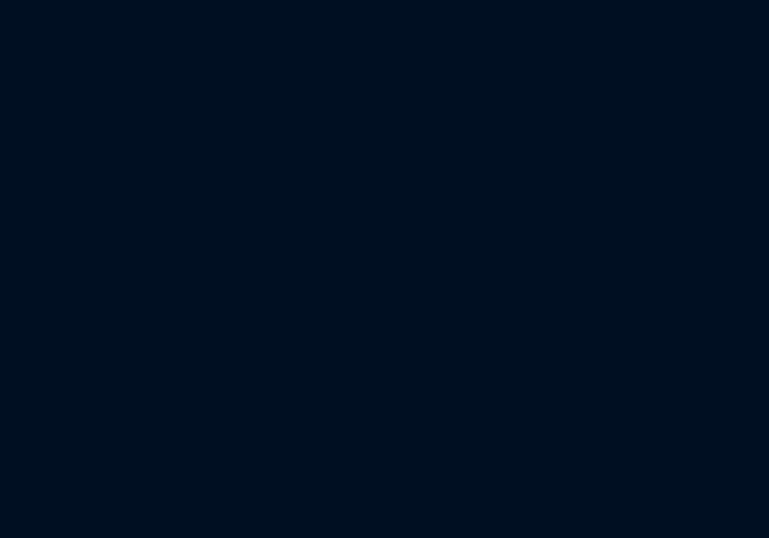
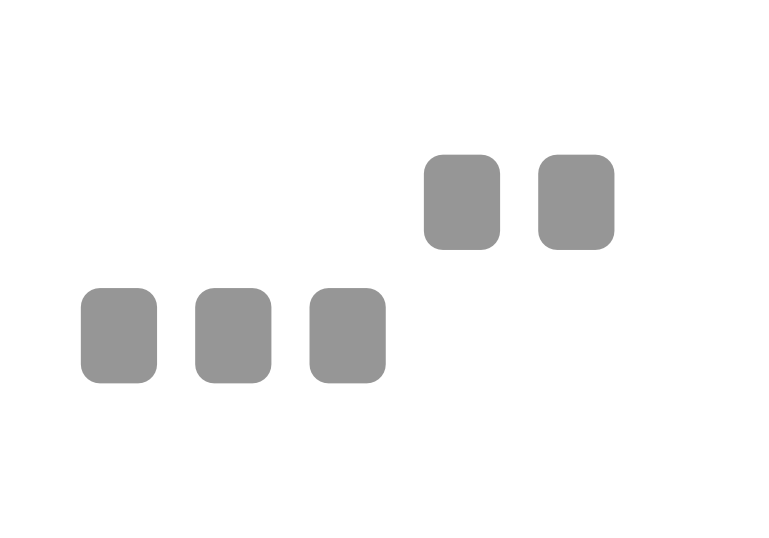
part: none -> (461, 202)
part: none -> (576, 202)
part: none -> (118, 335)
part: none -> (233, 335)
part: none -> (347, 335)

